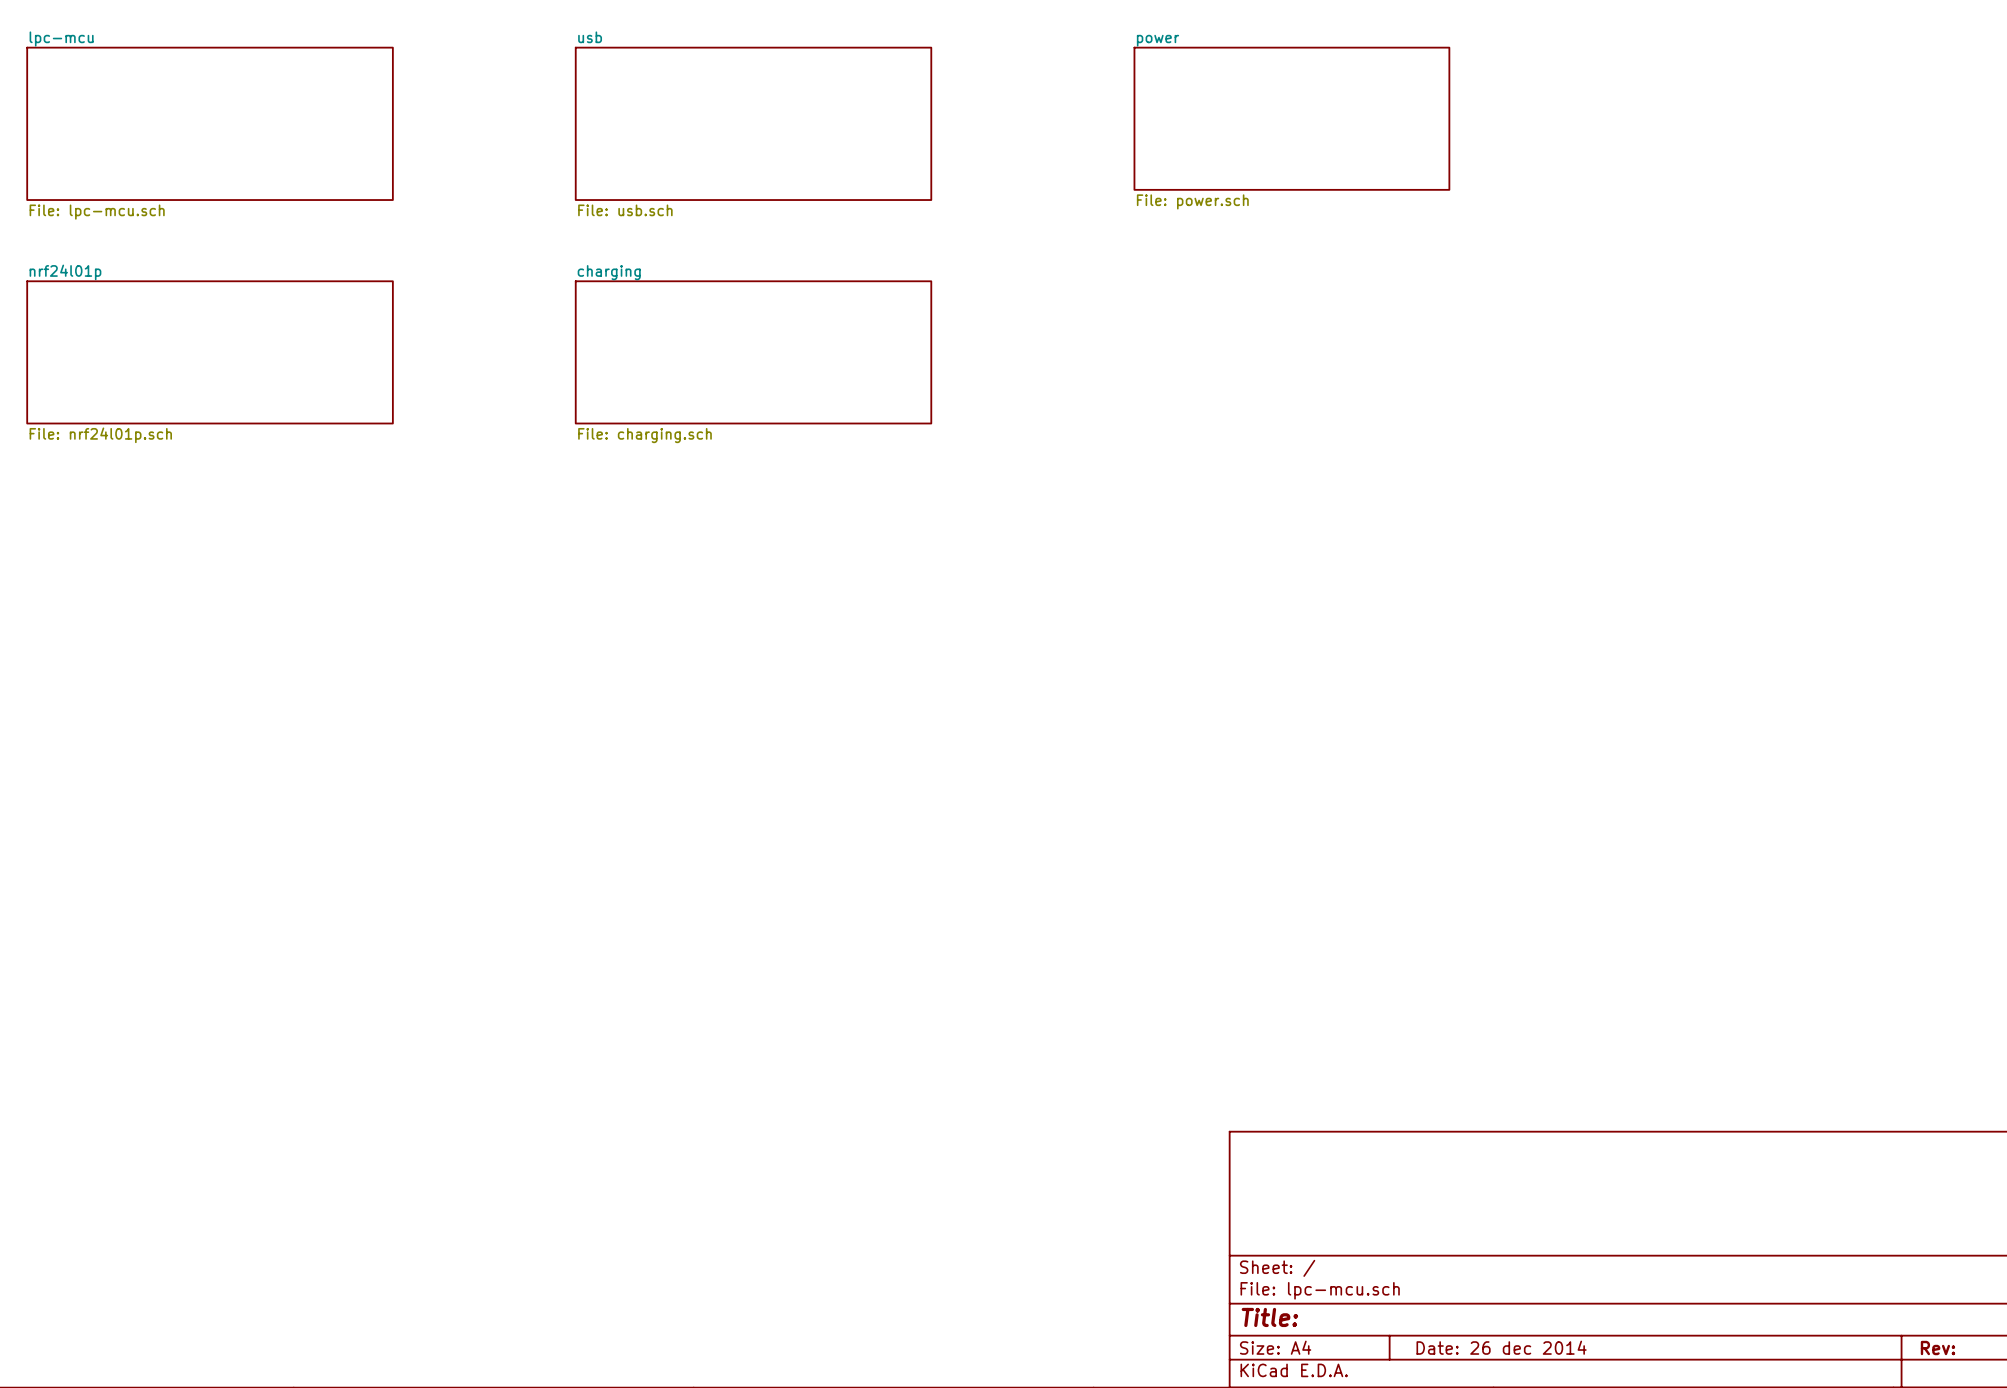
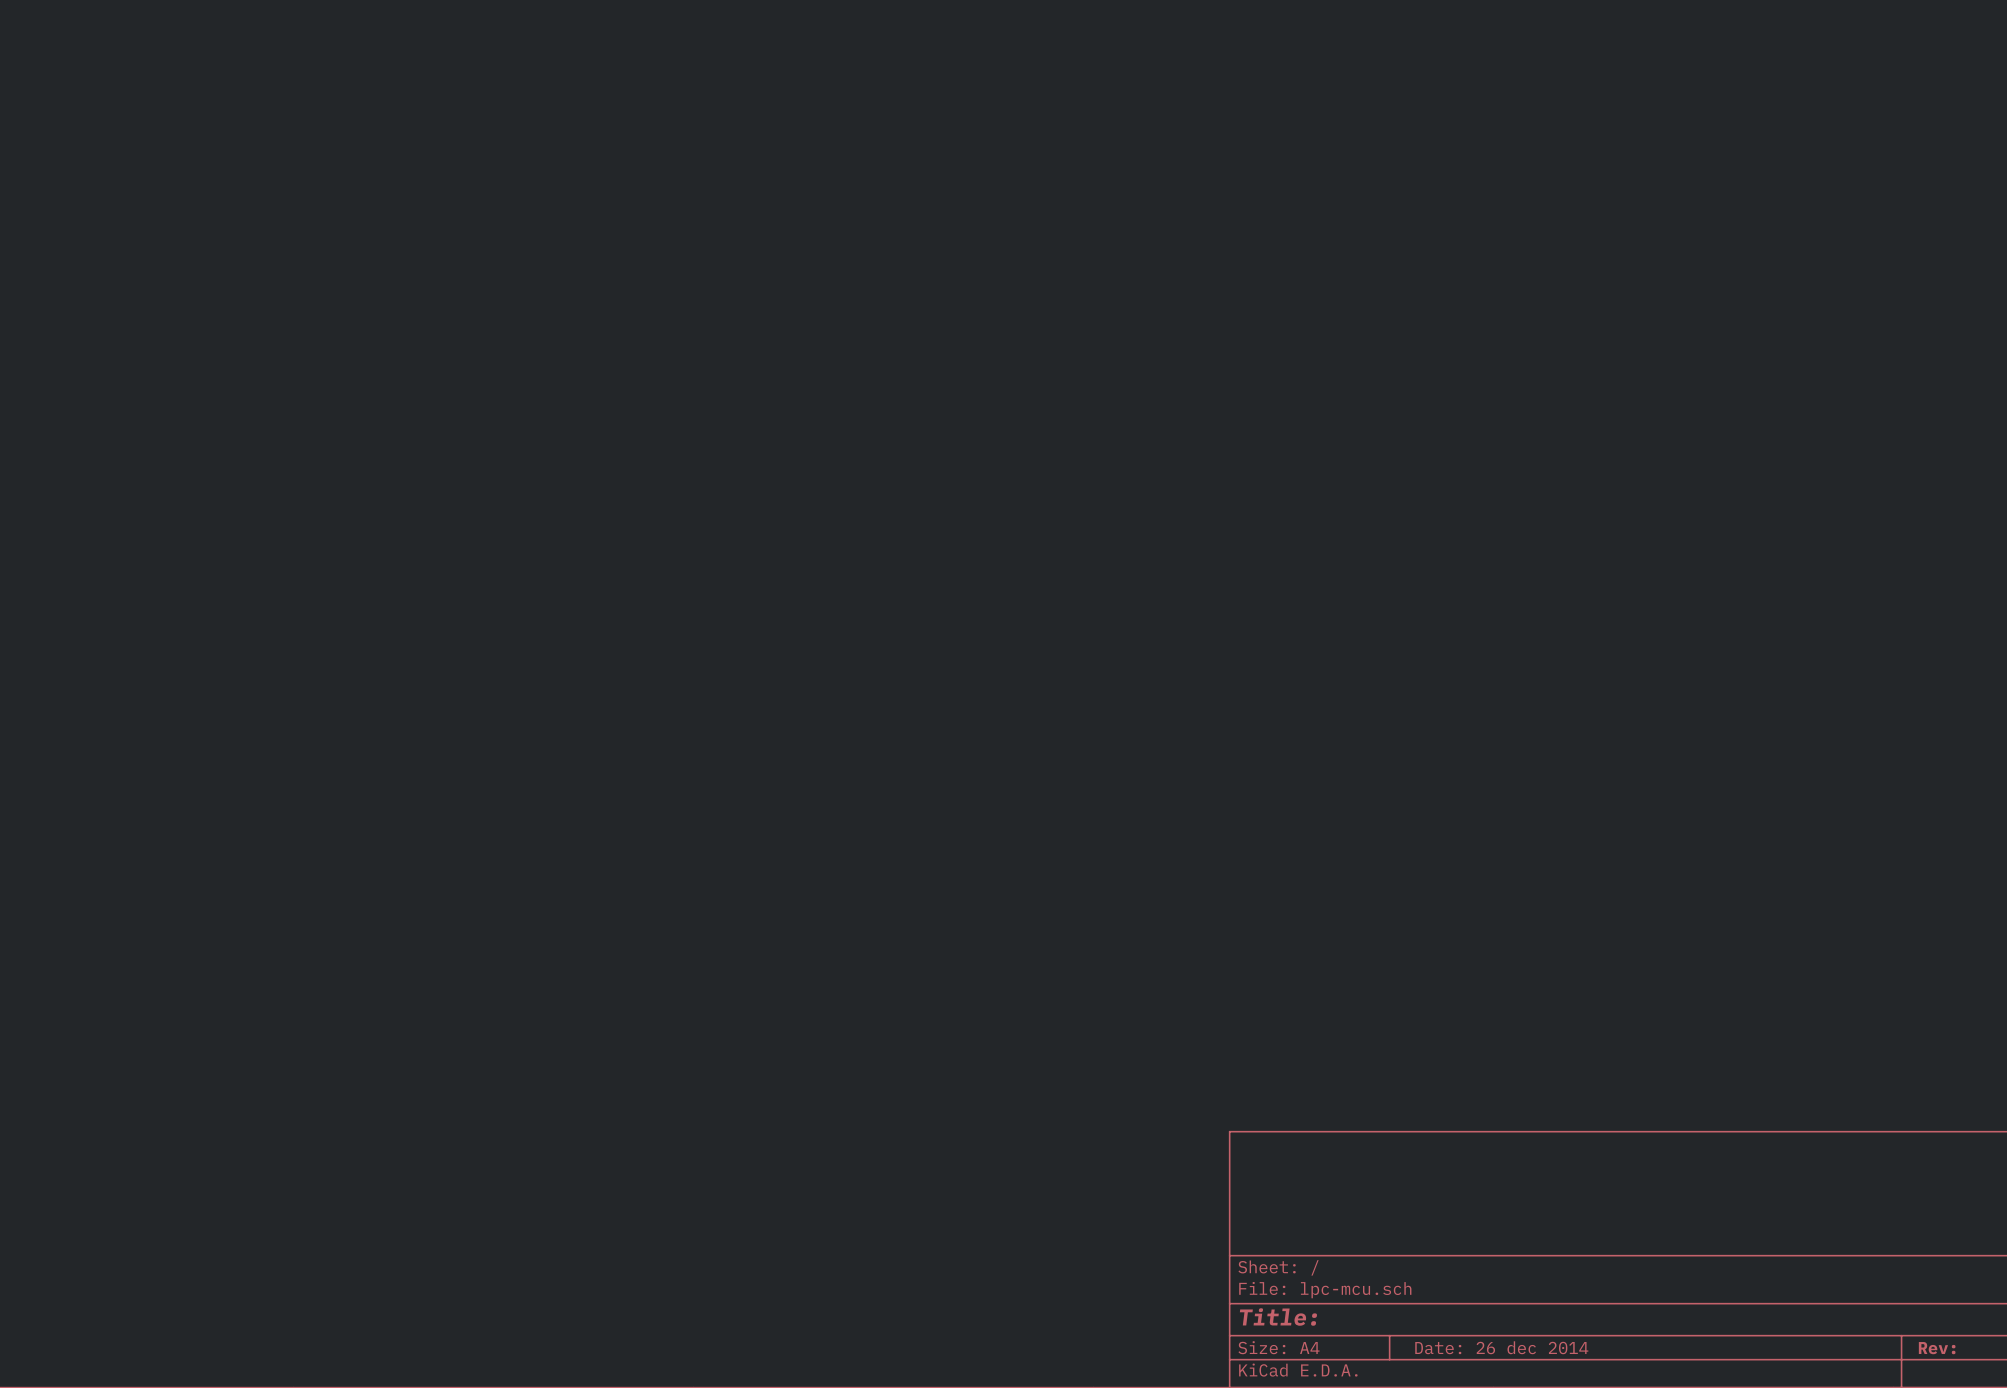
sheet power: File: power.sch (1291, 118) -> none
sheet lpc-mcu: File: lpc-mcu.sch (210, 123) -> none
sheet usb: File: usb.sch (753, 123) -> none
sheet nrf24l01p: File: nrf24l01p.sch (210, 352) -> none
sheet charging: File: charging.sch (753, 352) -> none

